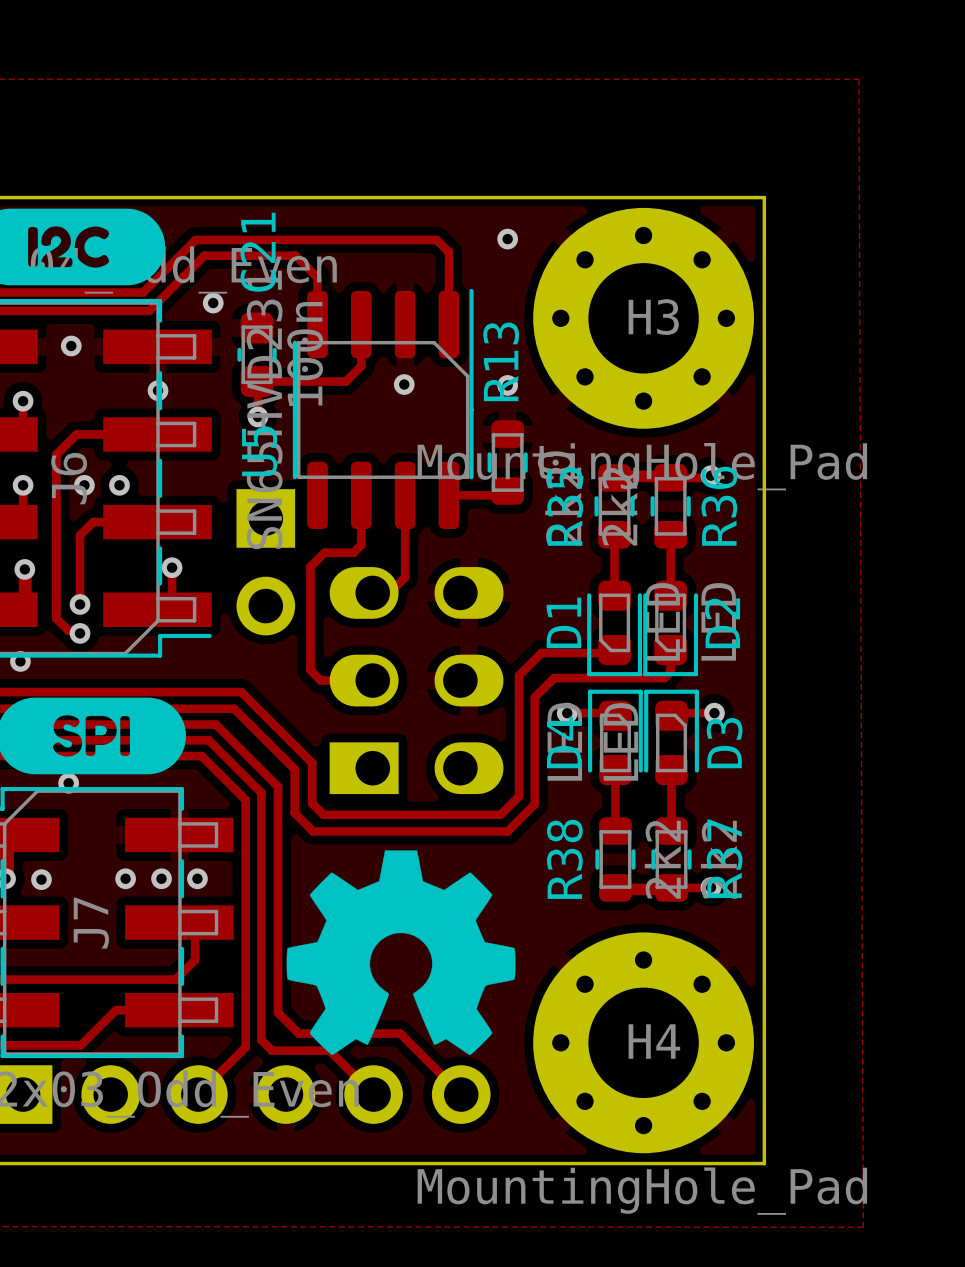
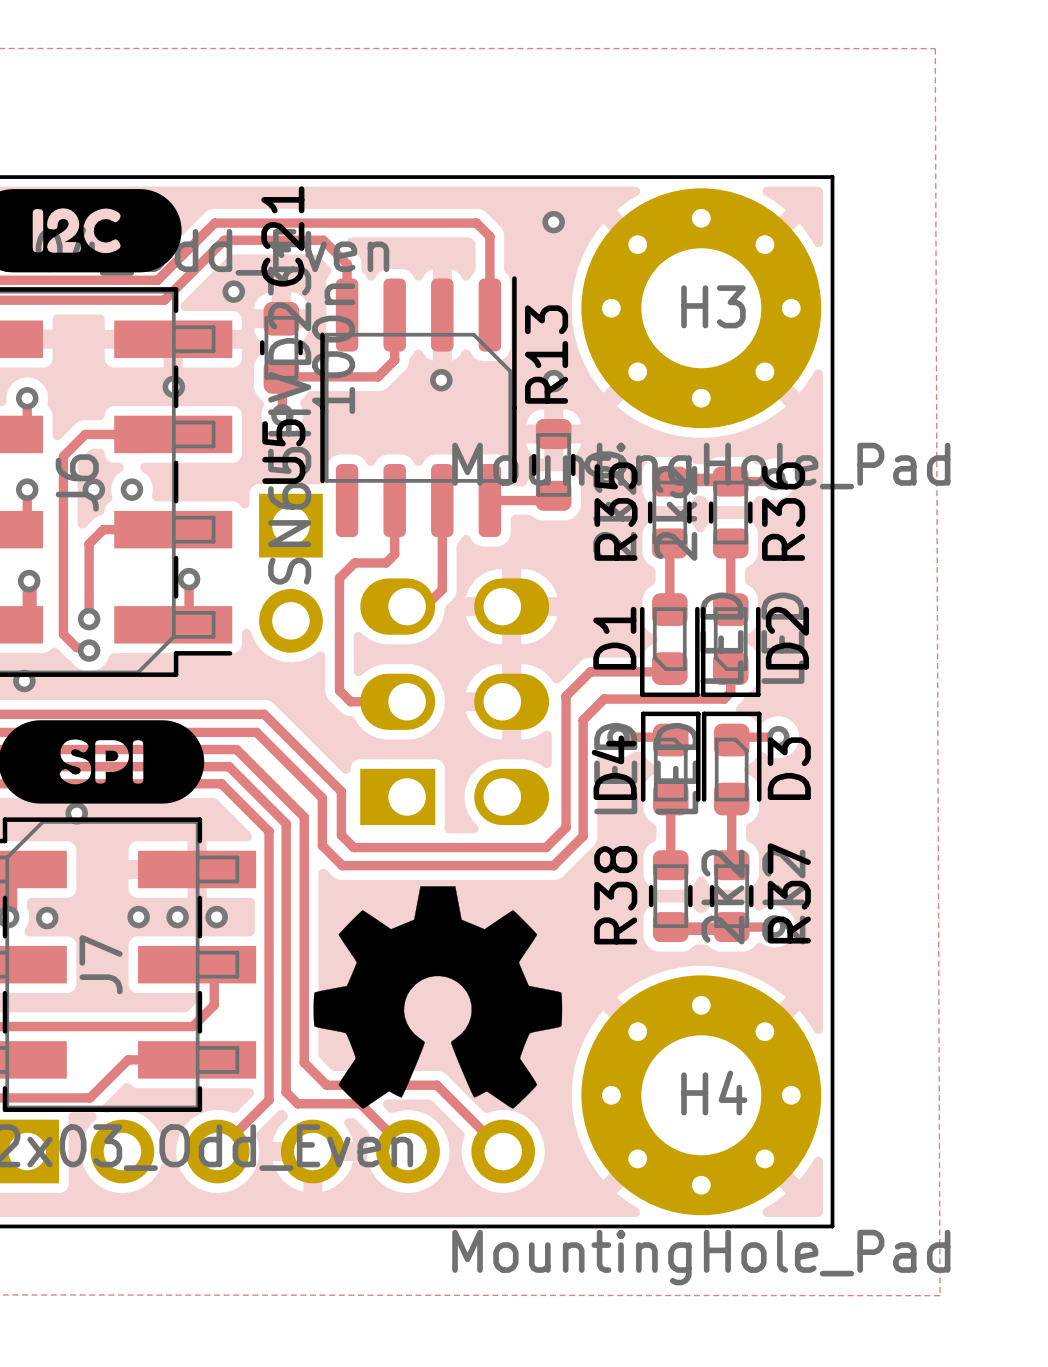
via: (71, 345) -> none

